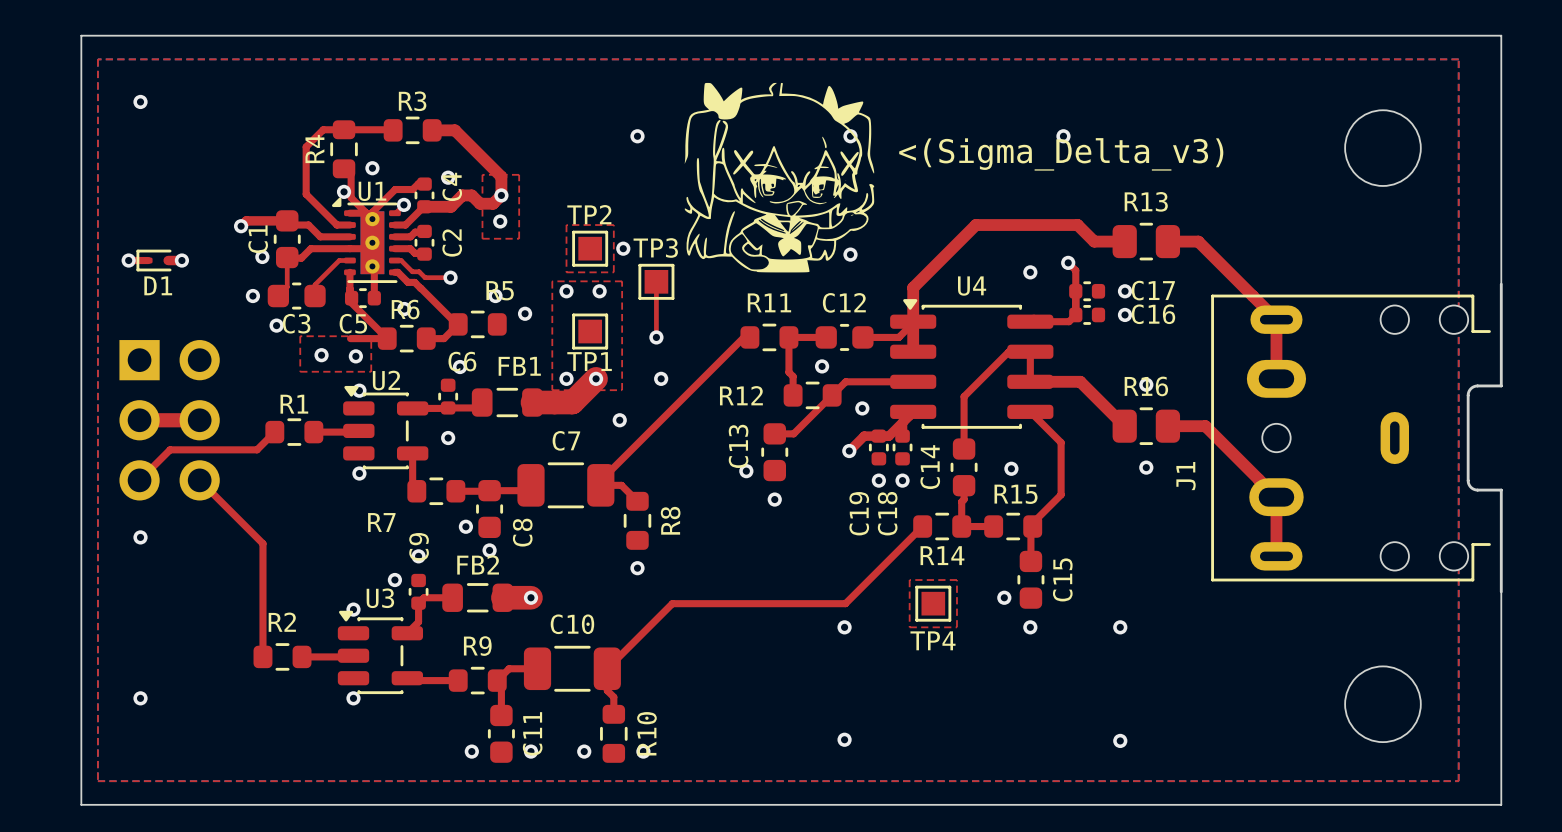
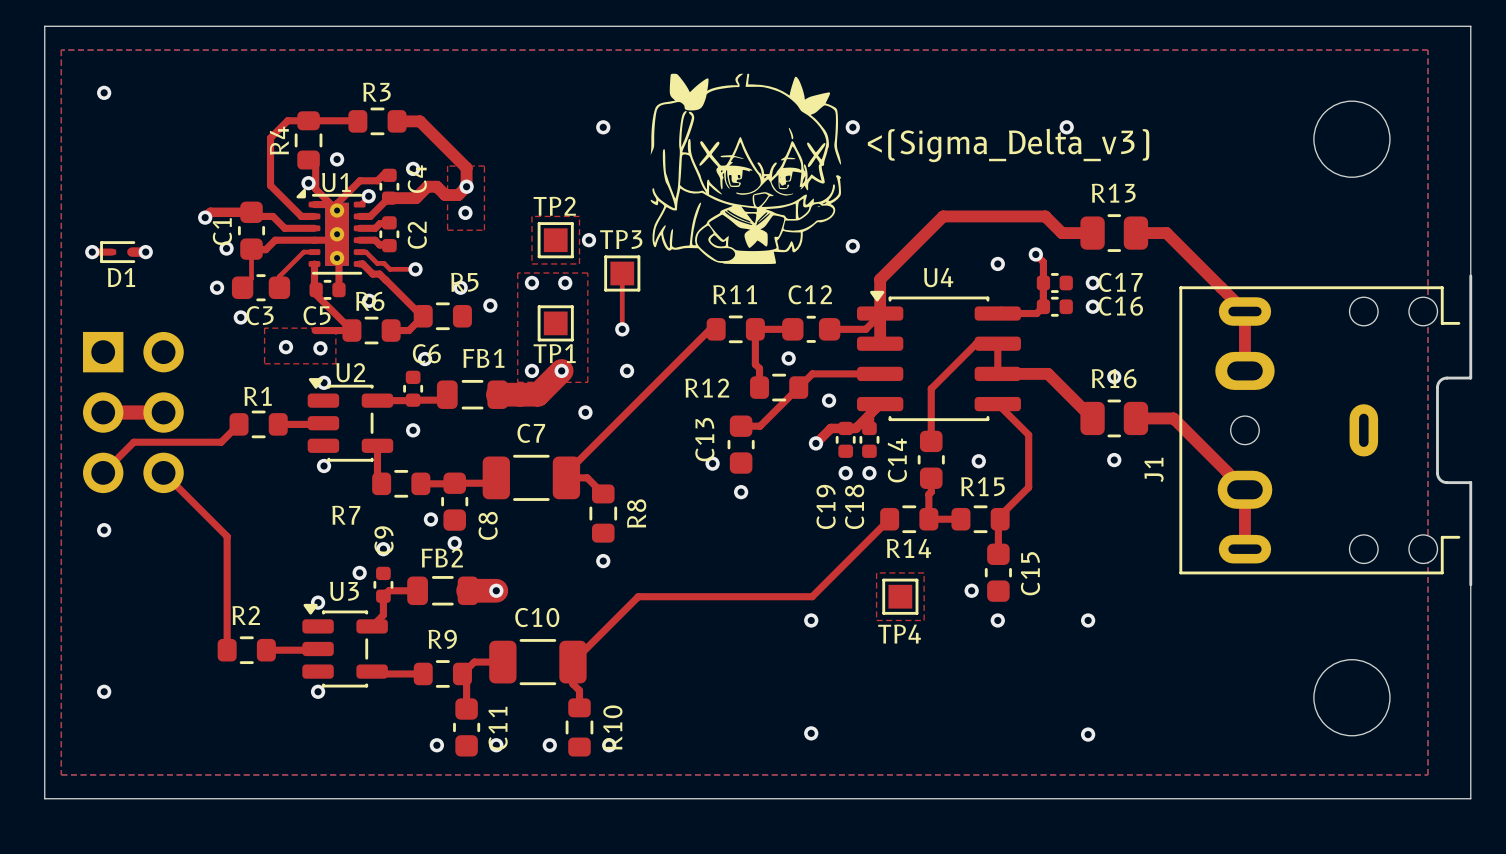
via position: (850, 136) -> (852, 127)
via position: (1063, 136) -> (1066, 127)
via position: (850, 254) -> (852, 246)

